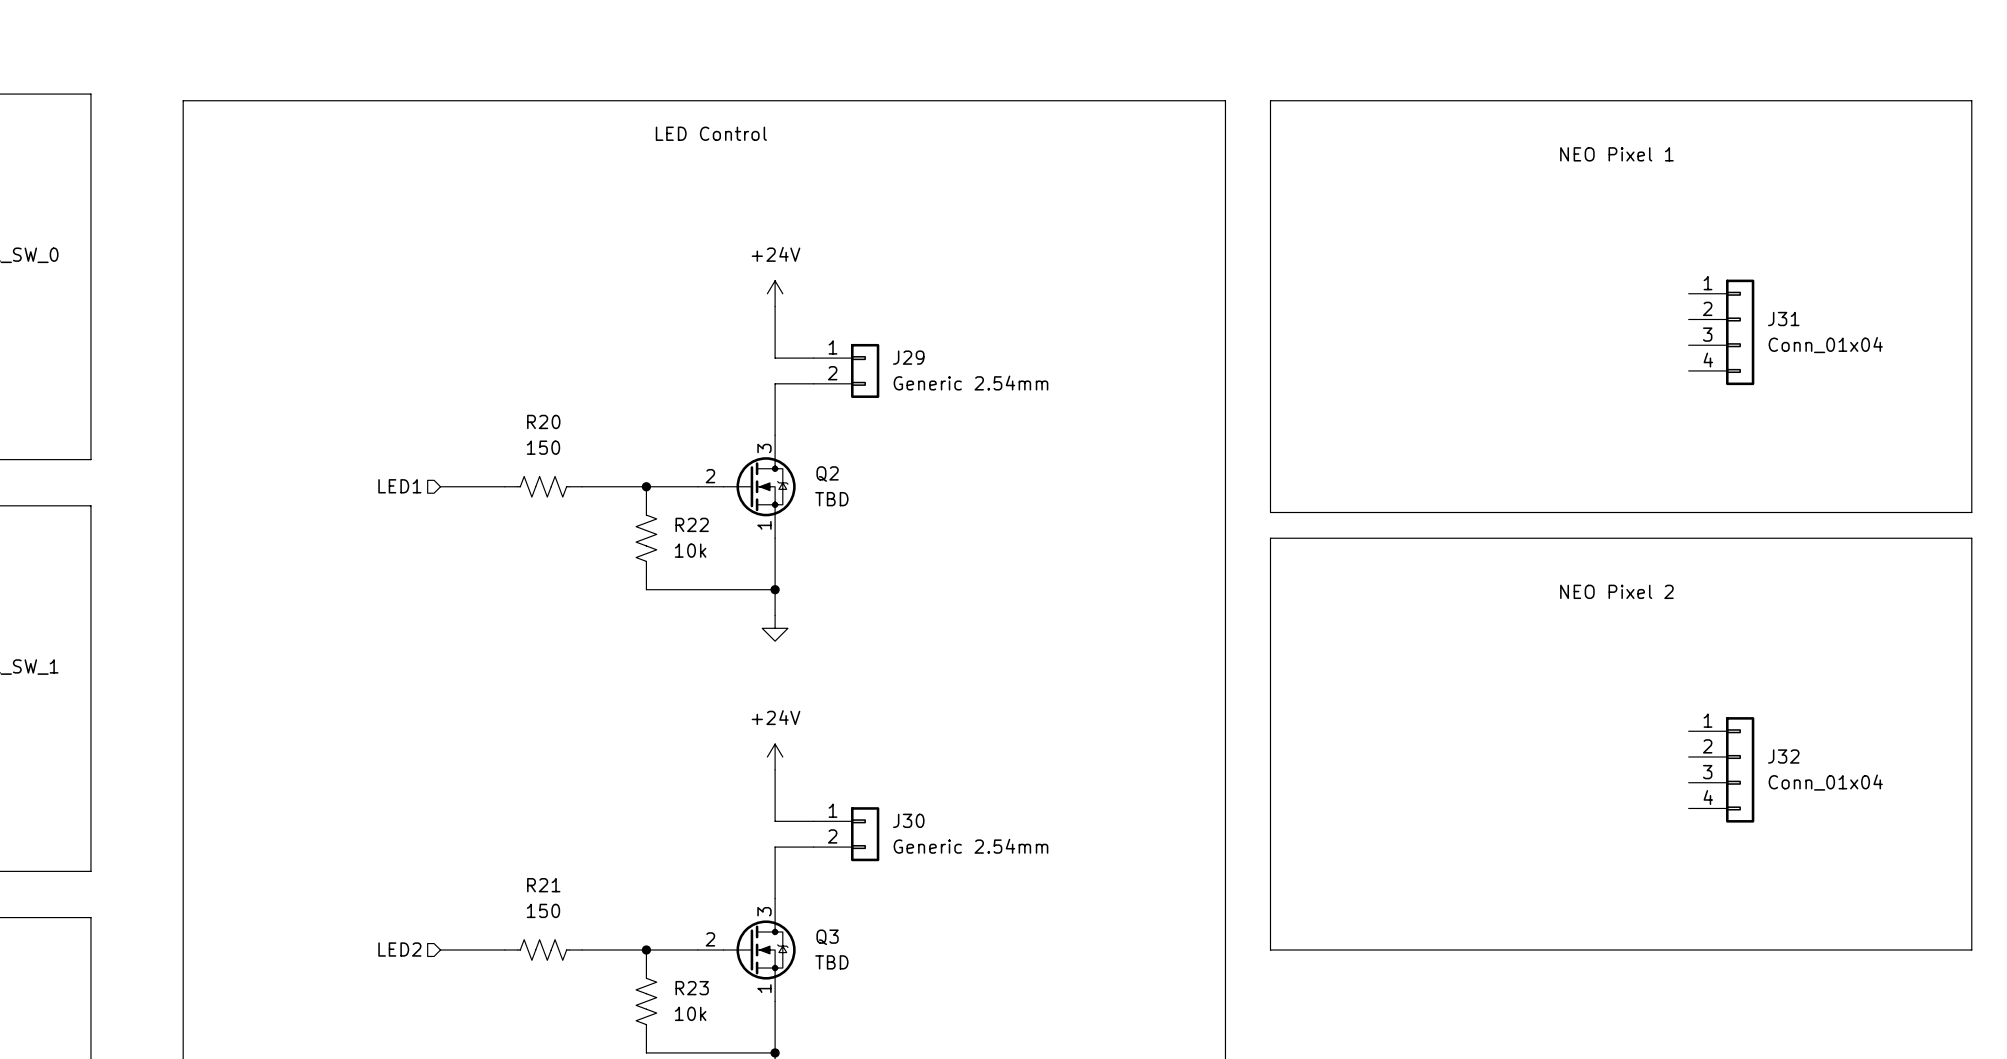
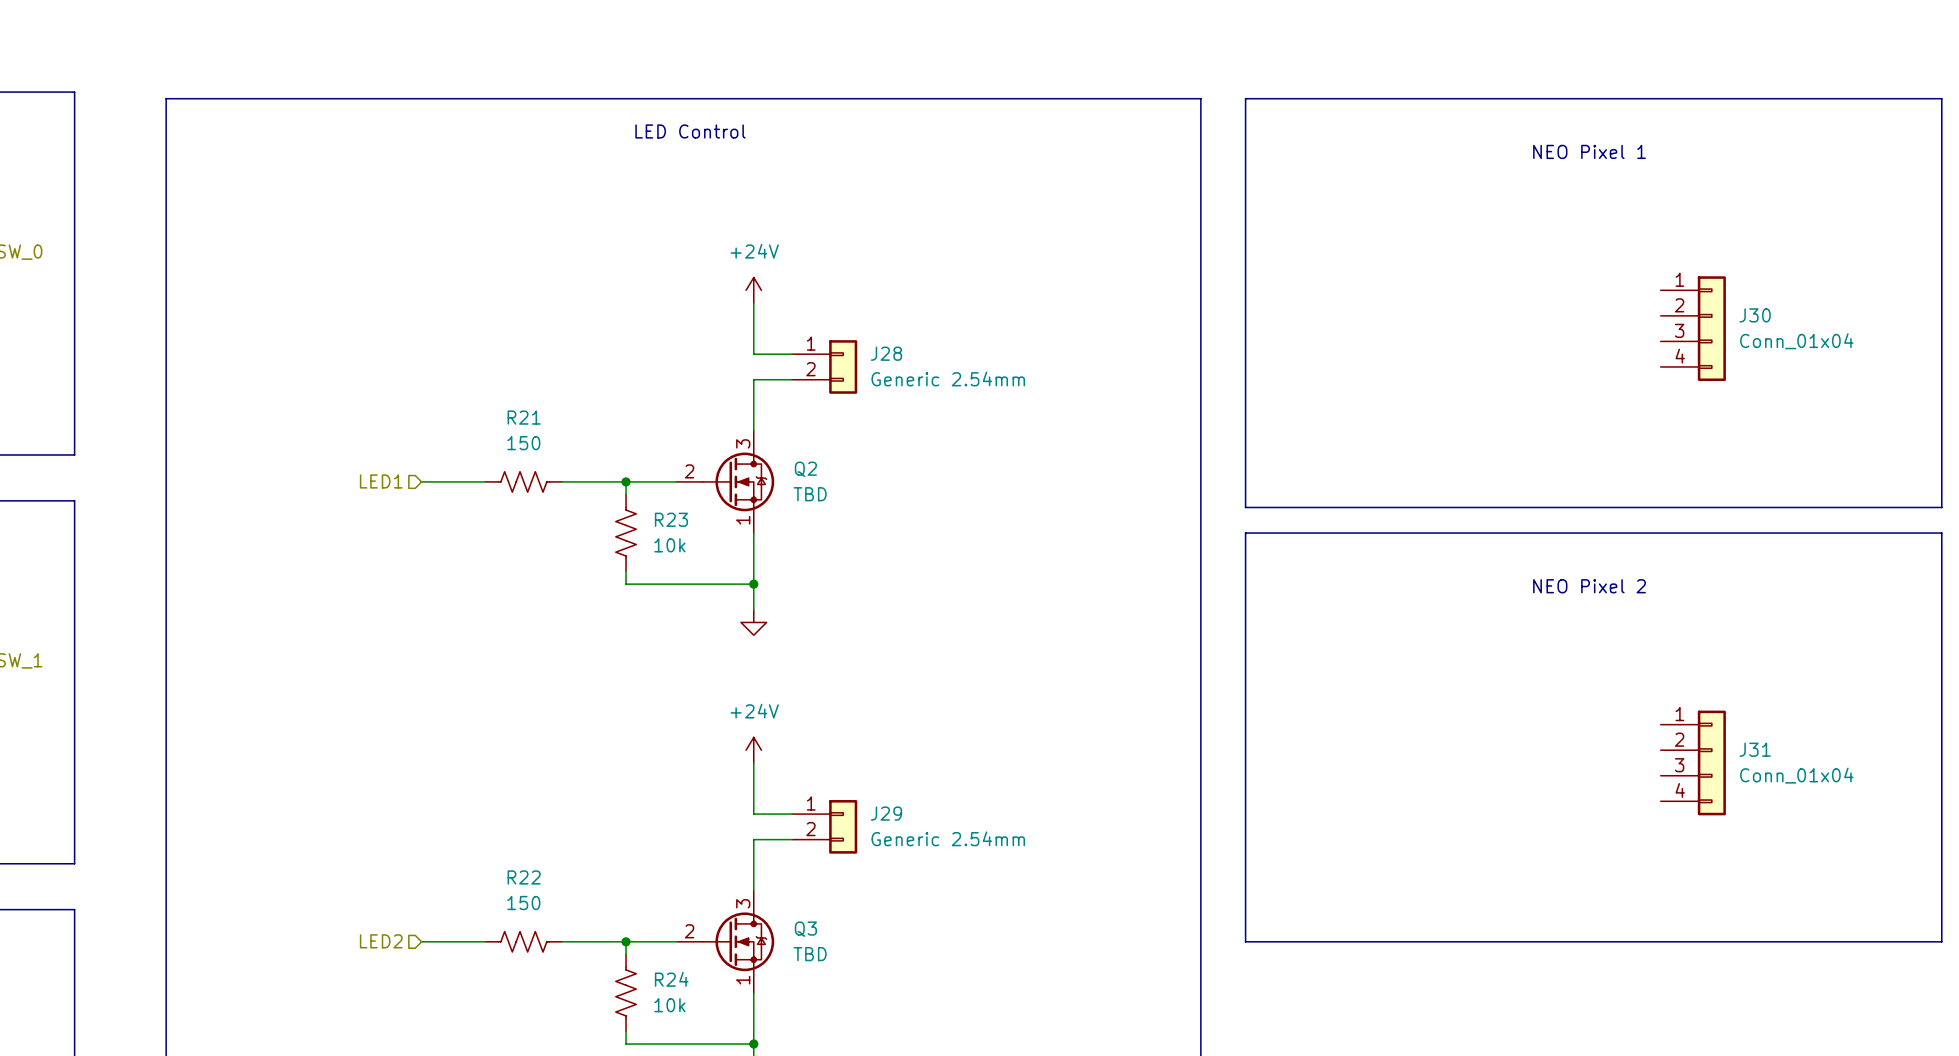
J31 name: J31 (1783, 319) -> J30 (1755, 315)
J29 name: J29 (908, 357) -> J28 (886, 353)
R20 name: R20 (543, 421) -> R21 (524, 417)
R22 name: R22 (692, 524) -> R23 (671, 519)
J32 name: J32 (1783, 756) -> J31 (1755, 749)
J30 name: J30 (908, 820) -> J29 (886, 813)
R21 name: R21 (543, 885) -> R22 (524, 877)
R23 name: R23 (692, 988) -> R24 (671, 979)

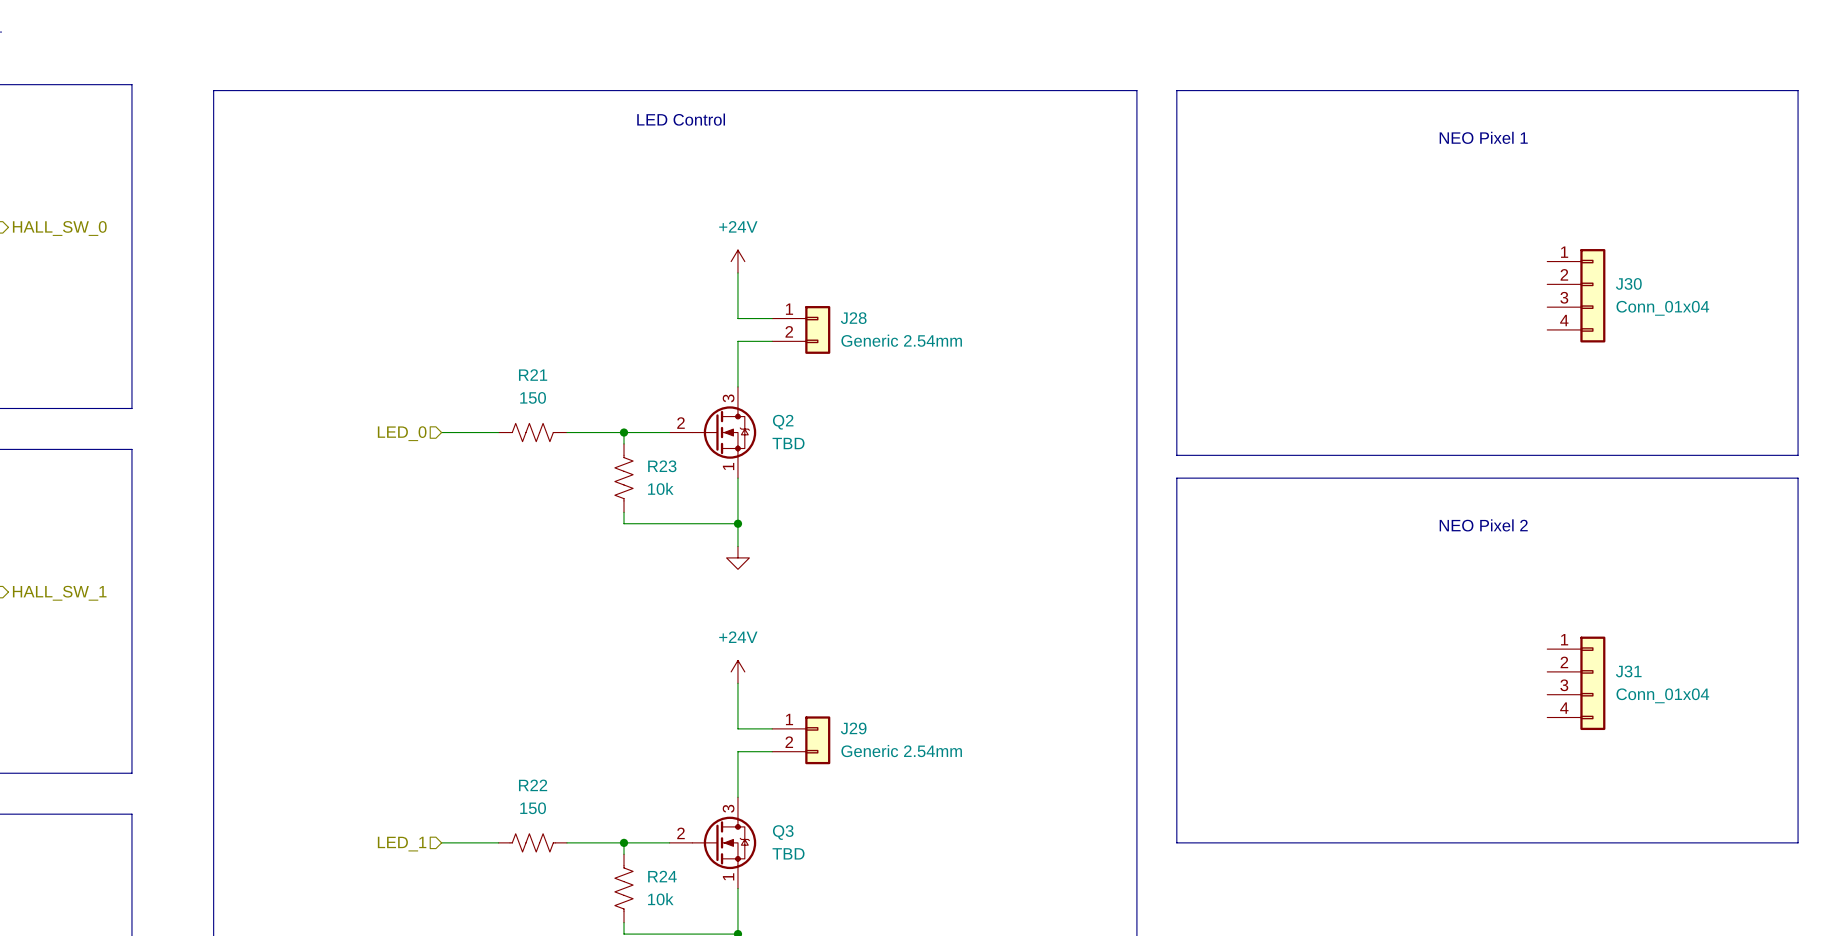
hierarchical label: LED1 (381, 481) -> LED_0 (402, 433)
hierarchical label: LED2 (381, 941) -> LED_1 (402, 844)

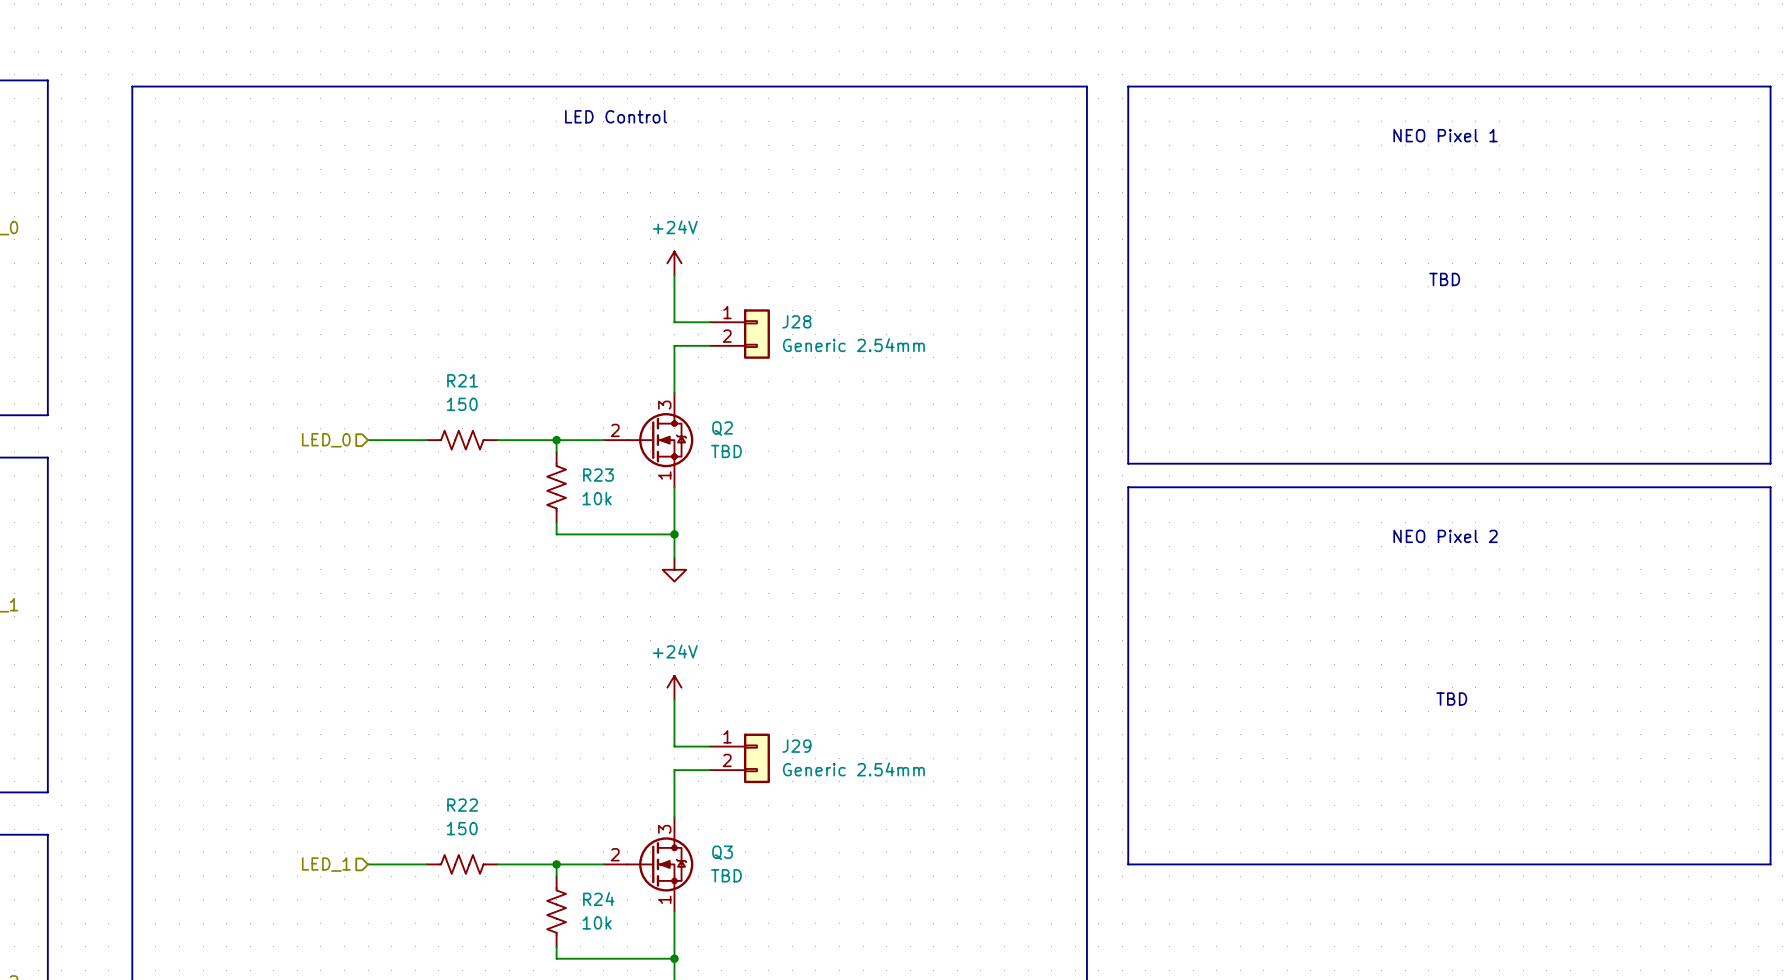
text: none -> TBD (1444, 279)
J30: Conn_01x04 (1576, 295) -> none
text: none -> TBD (1451, 699)
J31: Conn_01x04 (1576, 683) -> none

